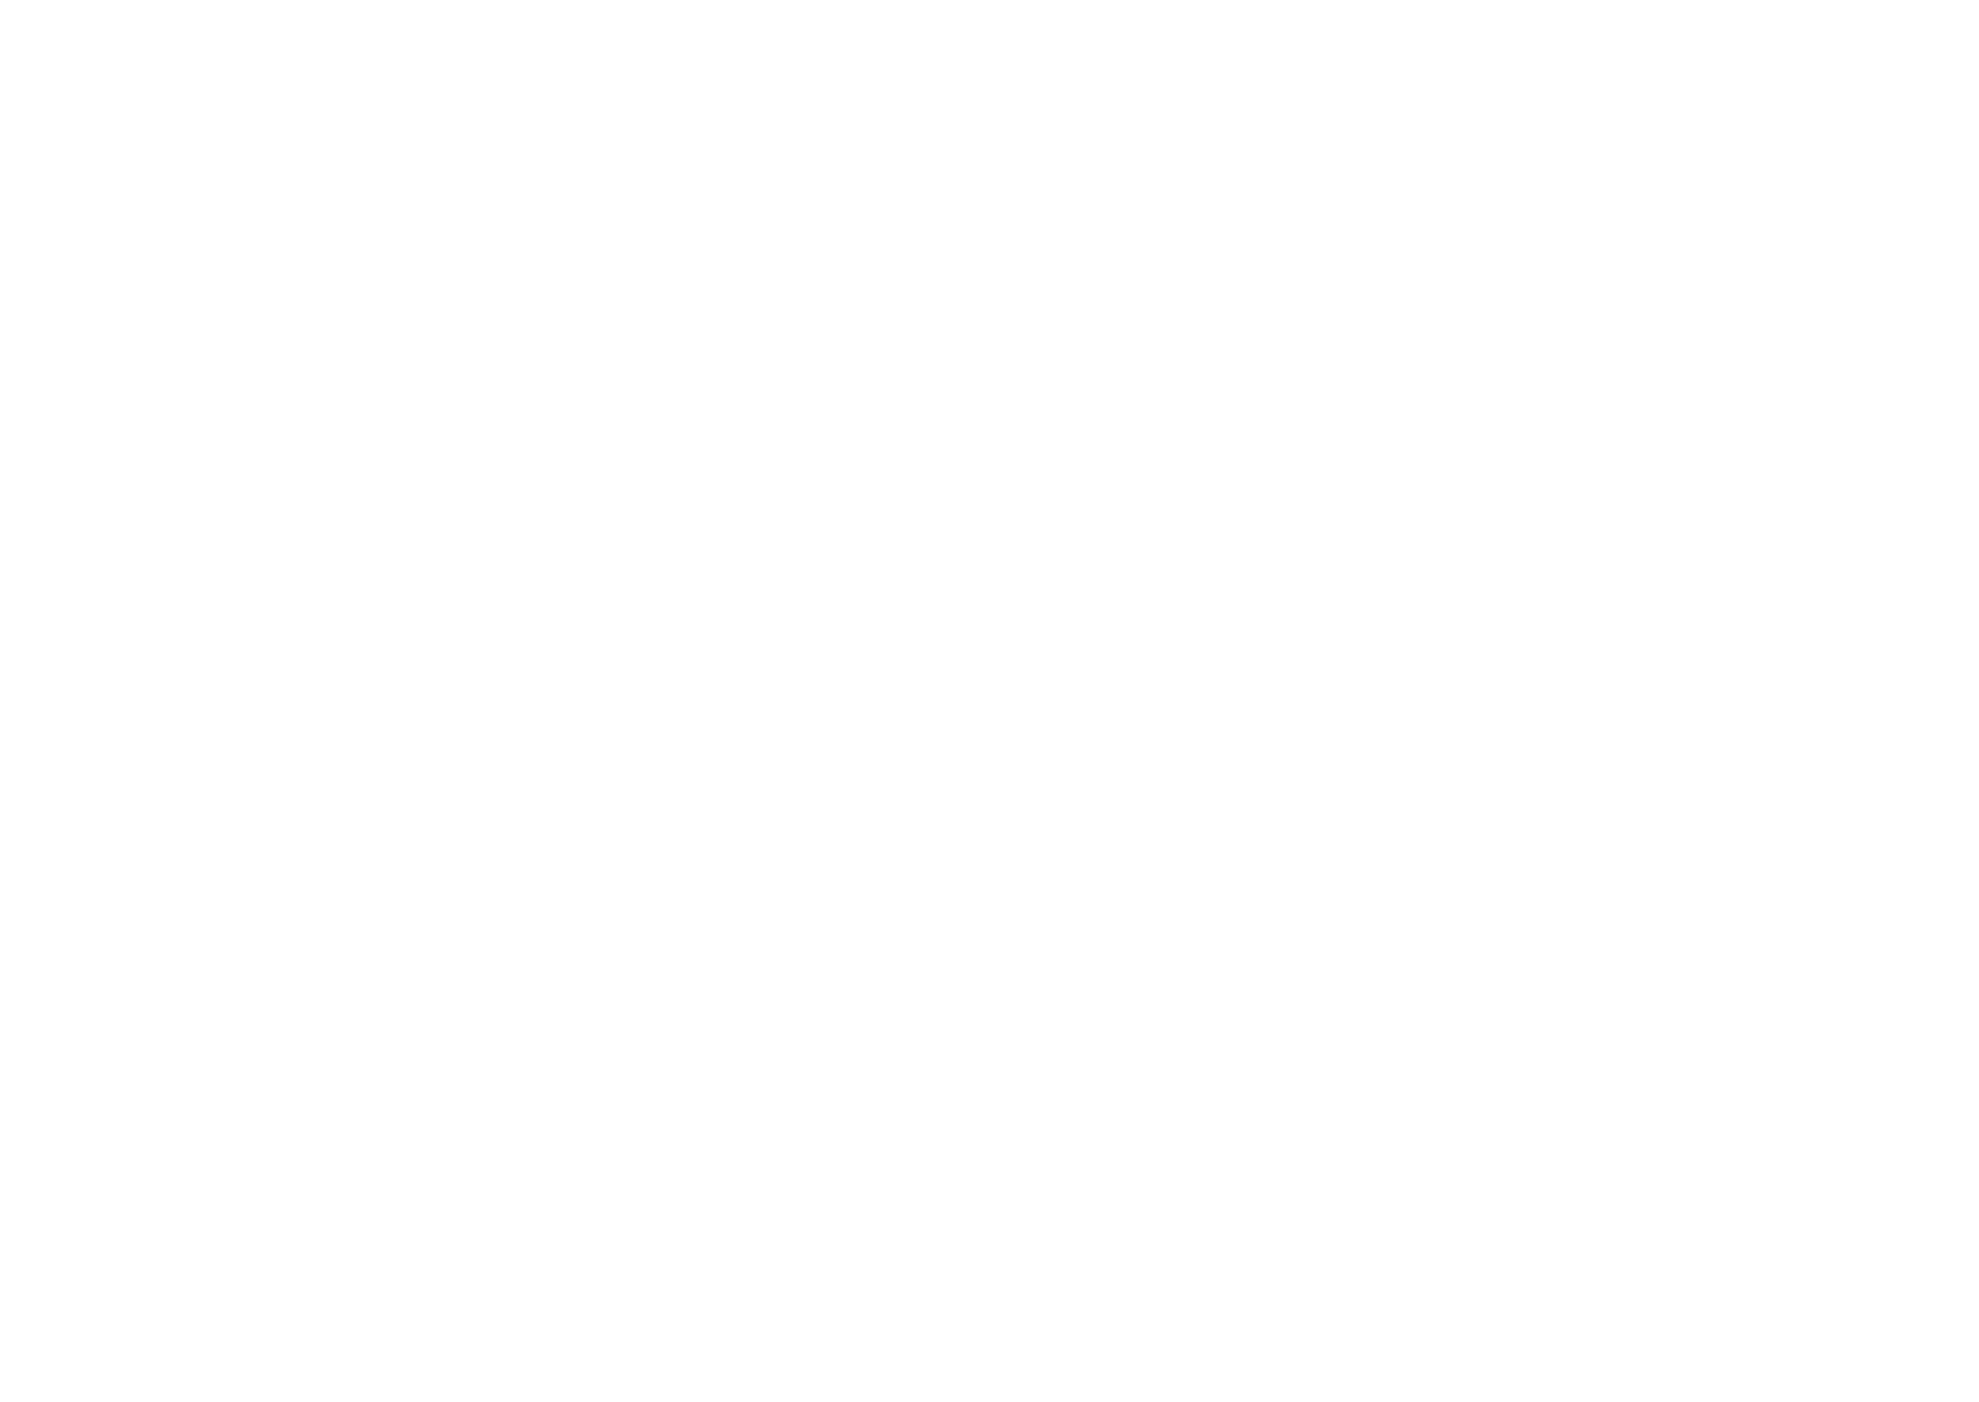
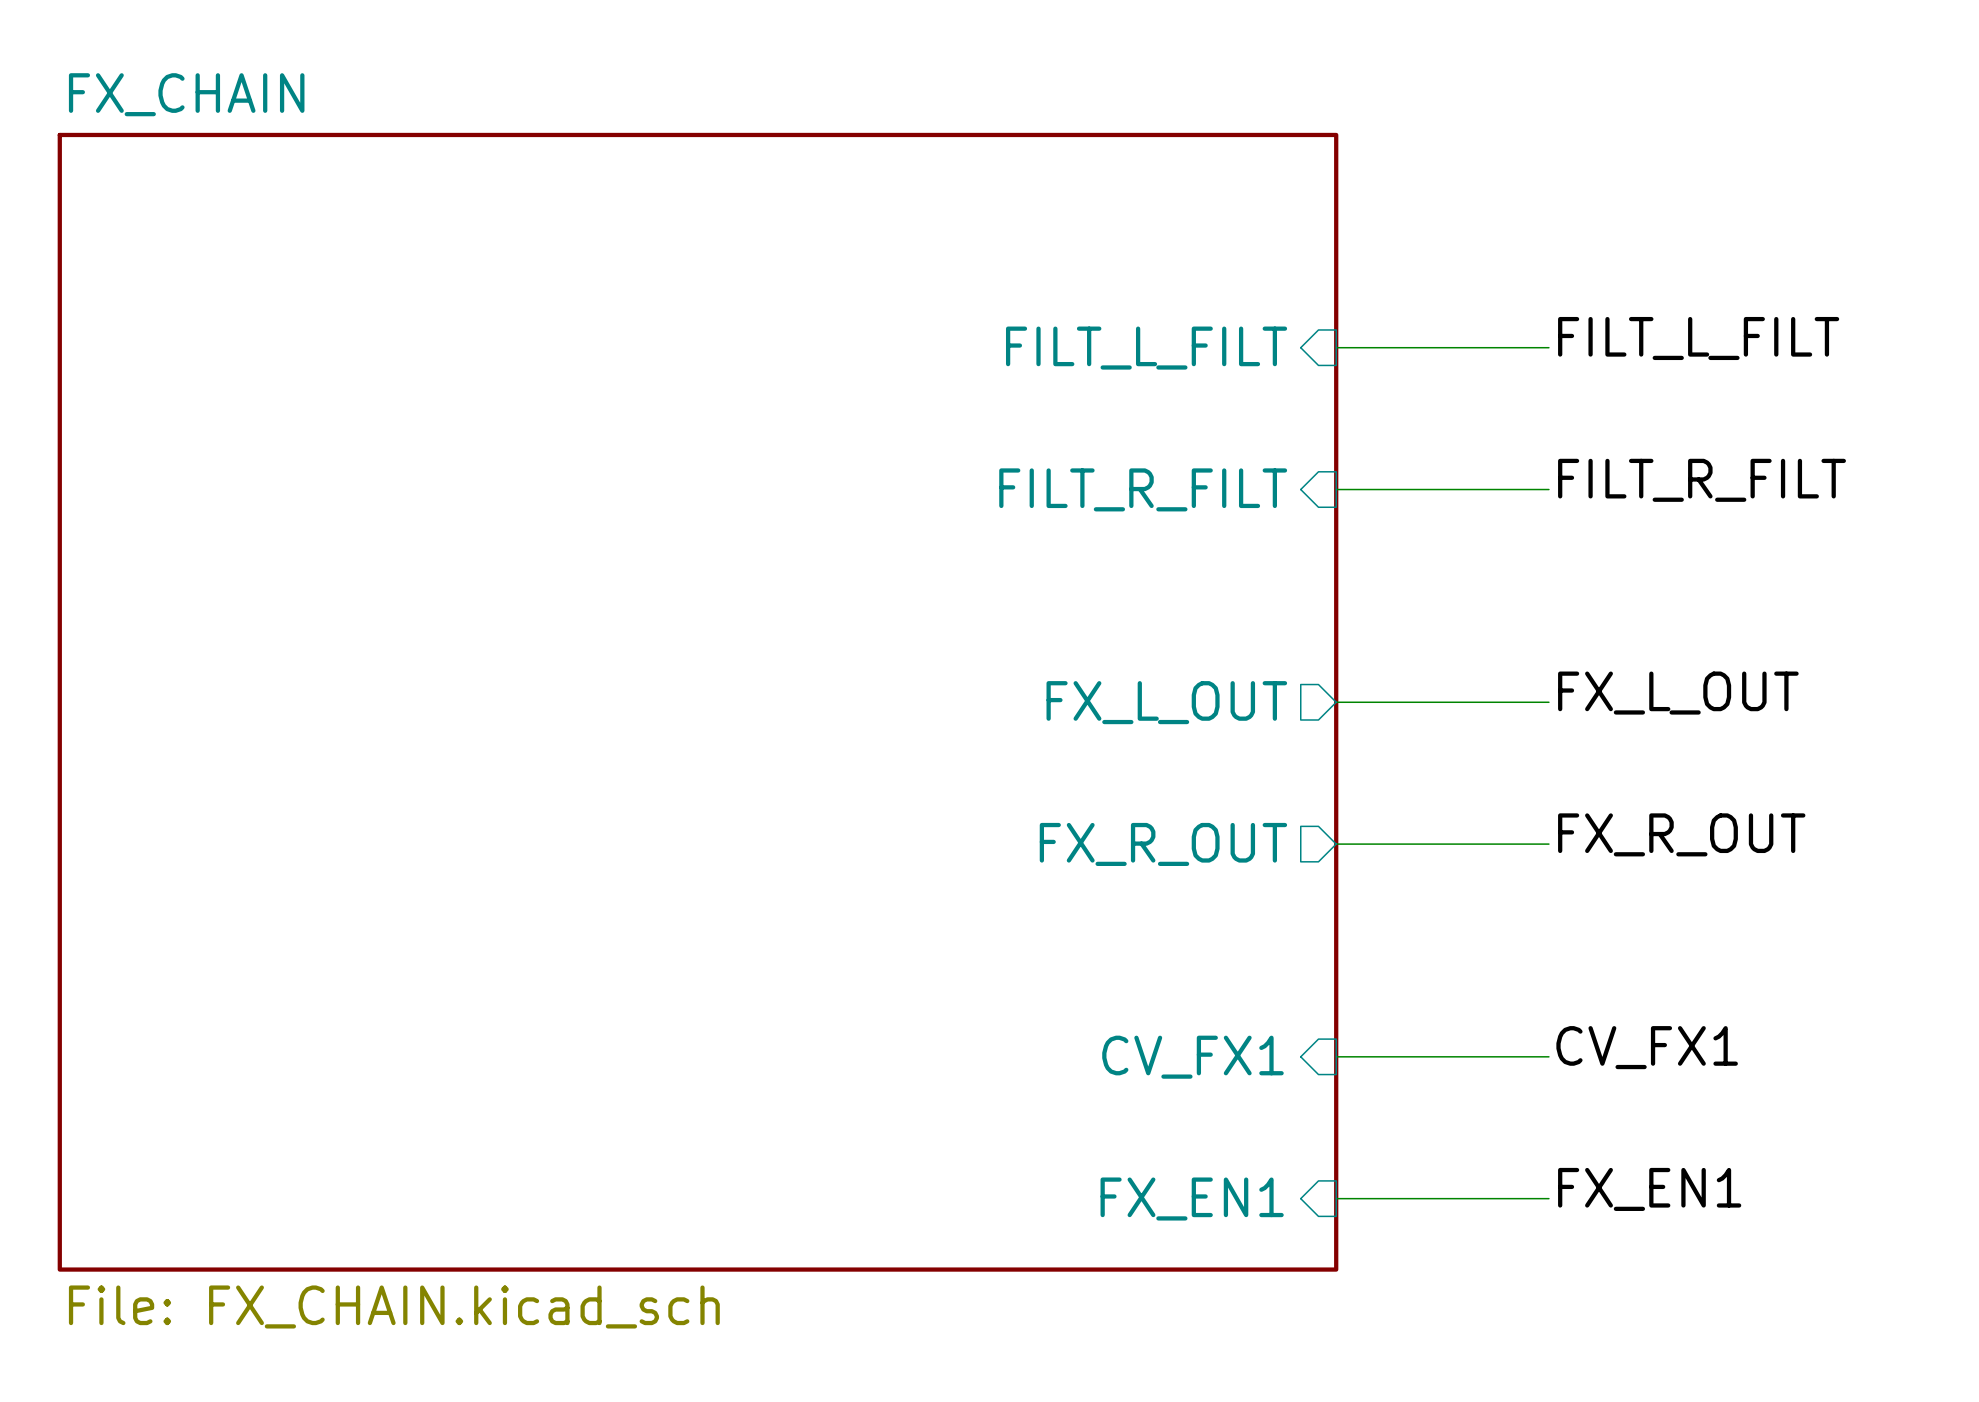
label: none -> FILT_L_FILT (1698, 338)
wire: none -> (1336, 347) (1548, 347)
sheet pin: none -> FILT_L_FILT (1146, 348)
label: none -> FILT_R_FILT (1702, 480)
sheet pin: none -> FILT_R_FILT (1143, 489)
wire: none -> (1336, 489) (1548, 489)
label: none -> FX_L_OUT (1678, 693)
sheet FX_CHAIN: none -> File: FX_CHAIN.kicad_sch (698, 702)
sheet pin: none -> FX_L_OUT (1166, 702)
wire: none -> (1336, 702) (1548, 702)
label: none -> FX_R_OUT (1681, 834)
sheet pin: none -> FX_R_OUT (1163, 844)
wire: none -> (1336, 844) (1548, 844)
label: none -> CV_FX1 (1647, 1047)
wire: none -> (1336, 1056) (1548, 1056)
sheet pin: none -> CV_FX1 (1192, 1057)
label: none -> FX_EN1 (1649, 1189)
wire: none -> (1336, 1198) (1548, 1198)
sheet pin: none -> FX_EN1 (1192, 1199)

